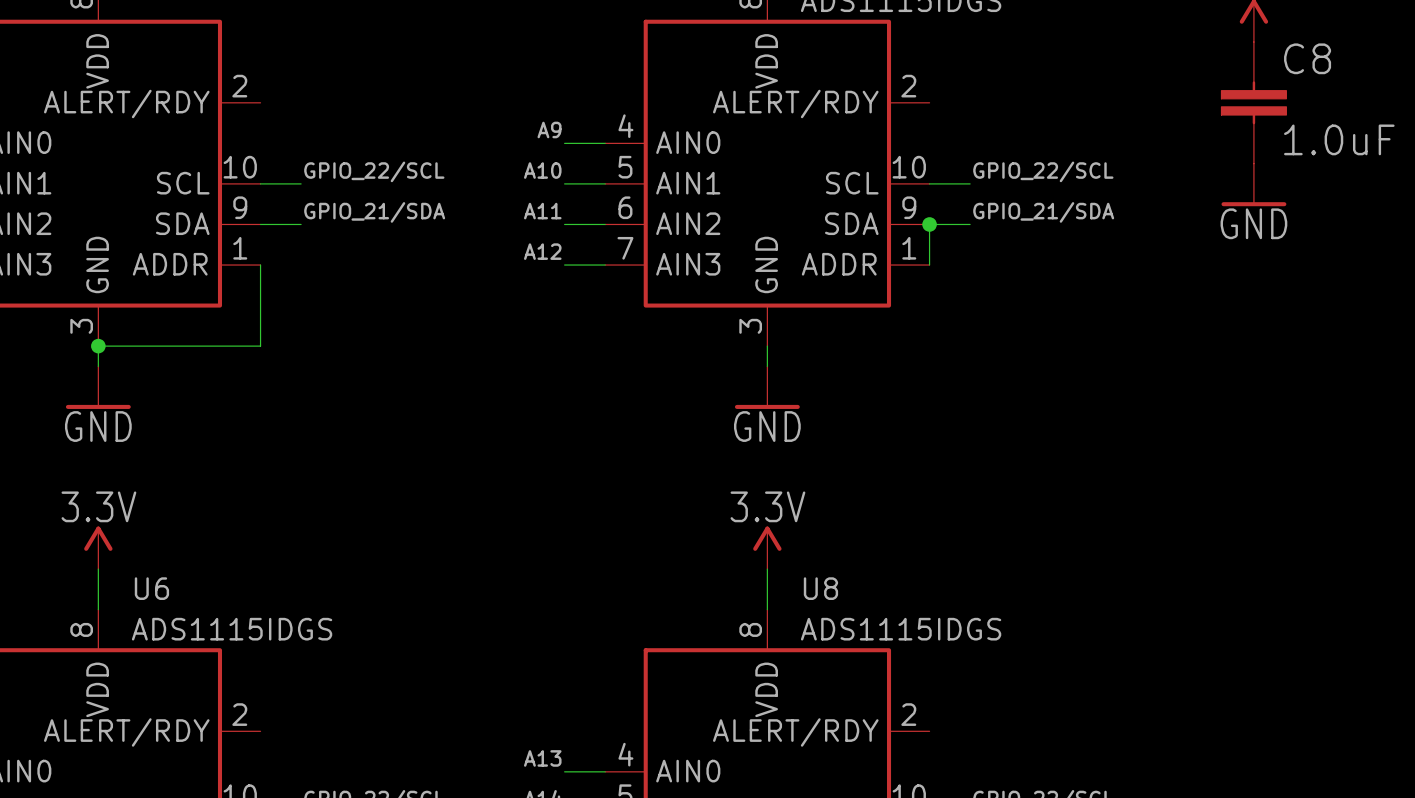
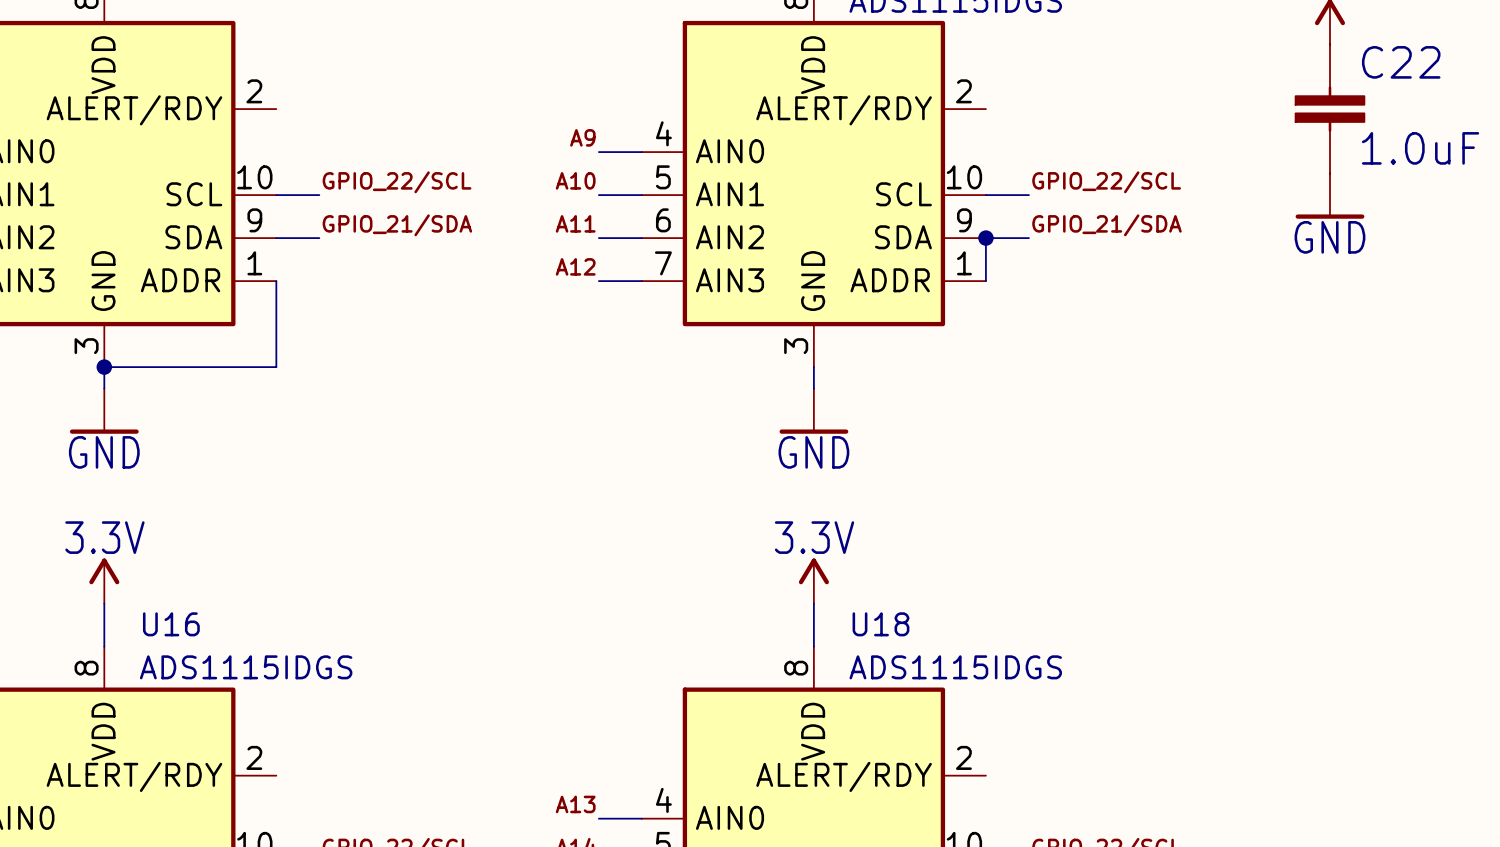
C8 name: C8 (1307, 58) -> C22 (1401, 62)
U6 name: U6 (151, 588) -> U16 (171, 624)
U8 name: U8 (820, 588) -> U18 (880, 624)

